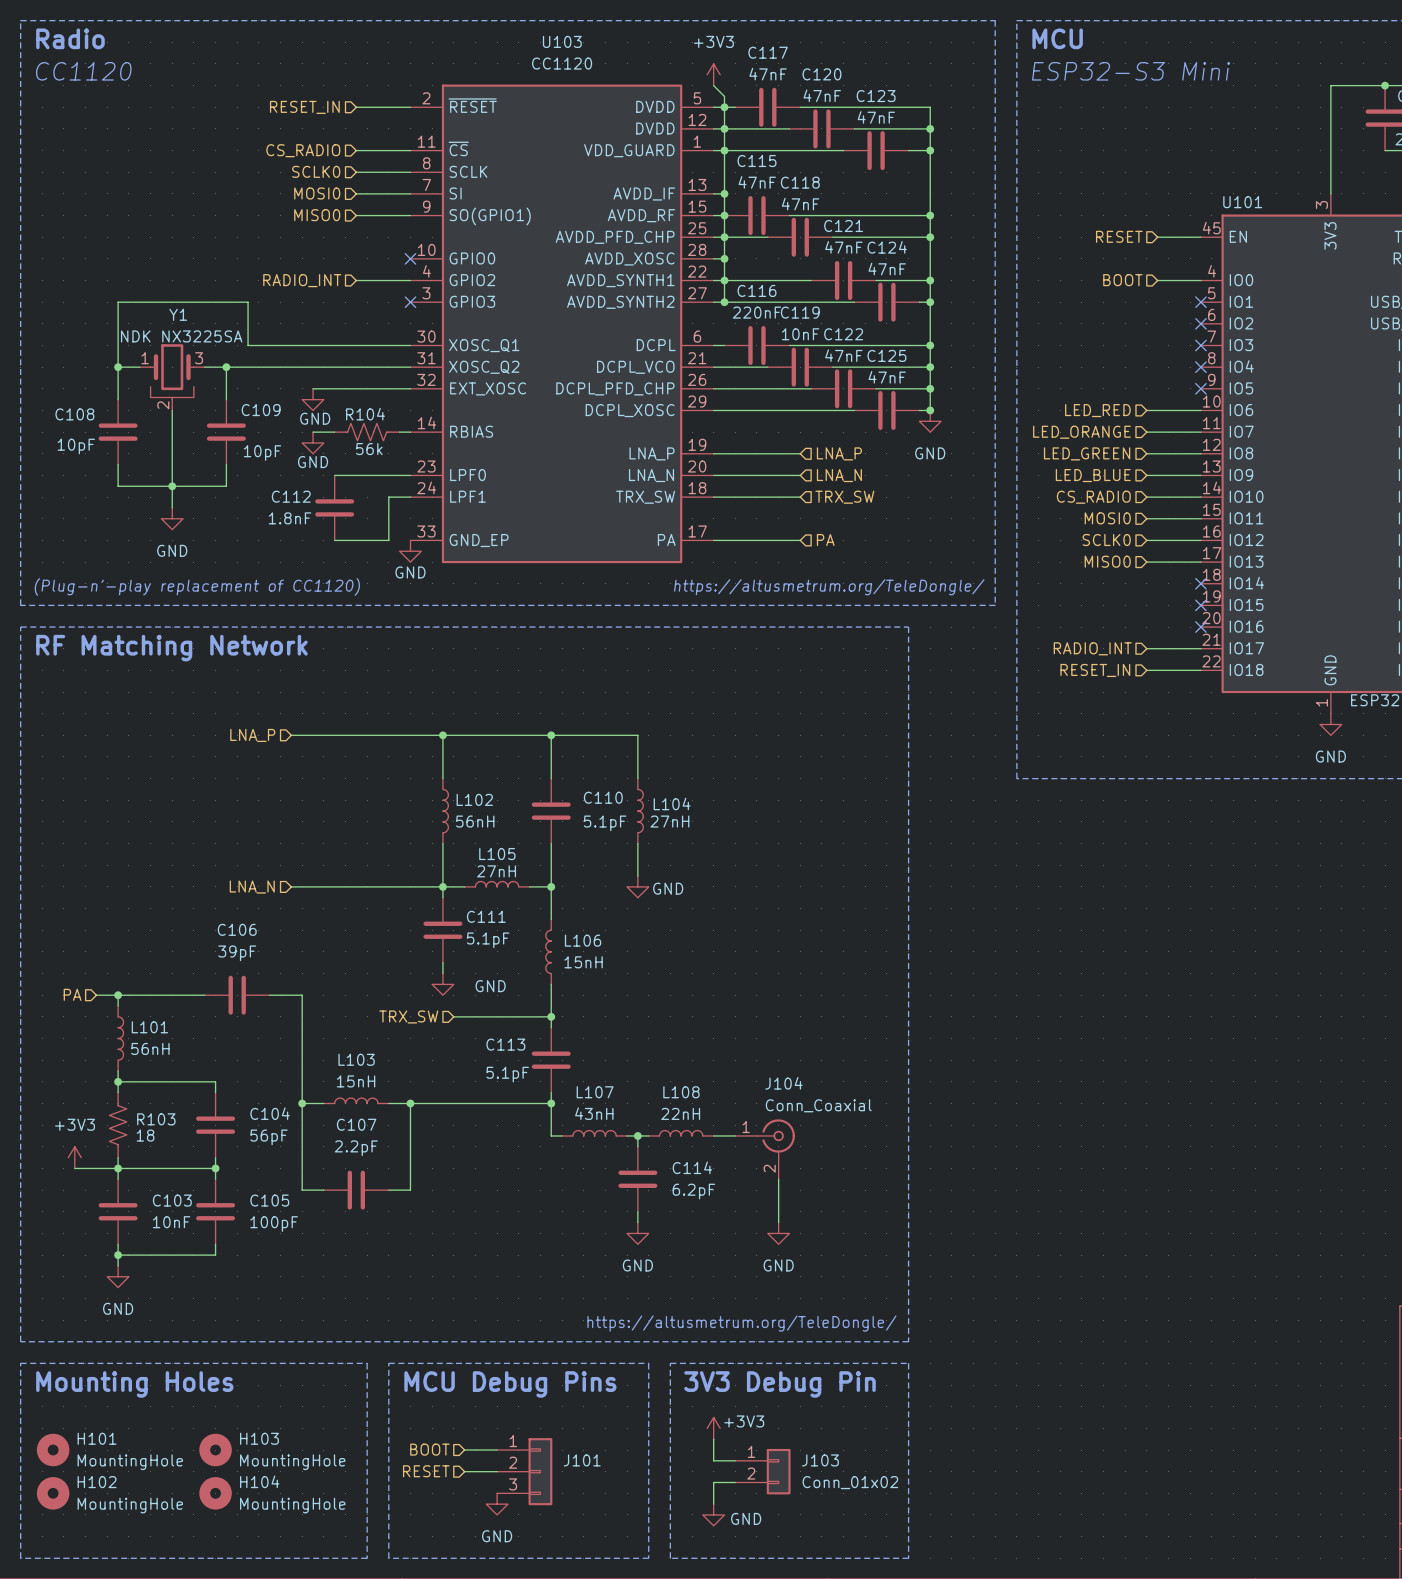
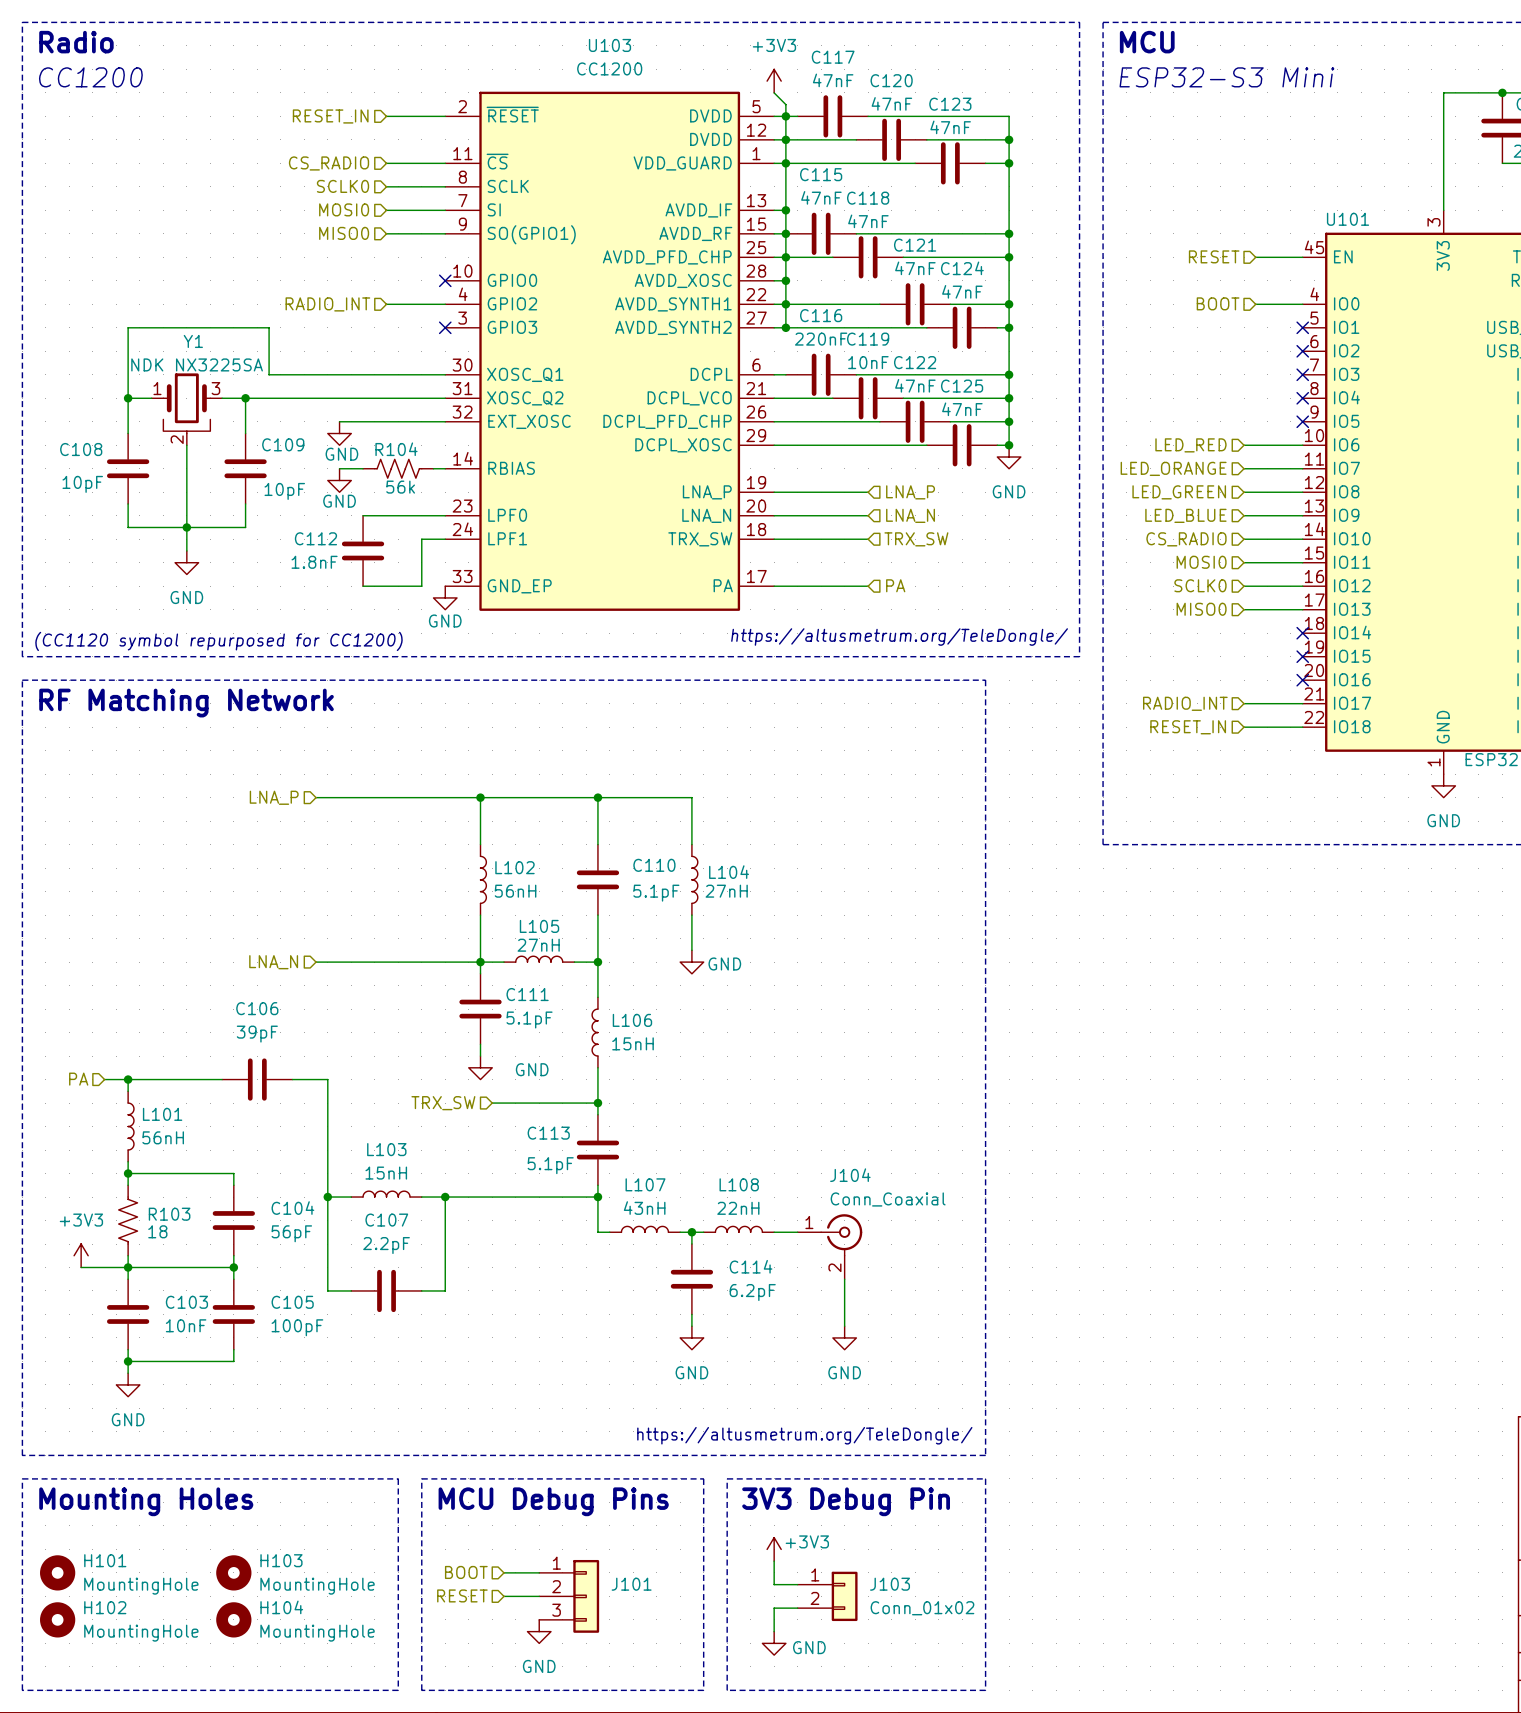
U103 value: CC1120 (562, 63) -> CC1200 (609, 68)
text: CC1120 (83, 71) -> CC1200 (90, 77)
text: (Plug-n'-play replacement of CC1120) (197, 586) -> (CC1120 symbol repurposed for CC1200) (218, 641)

